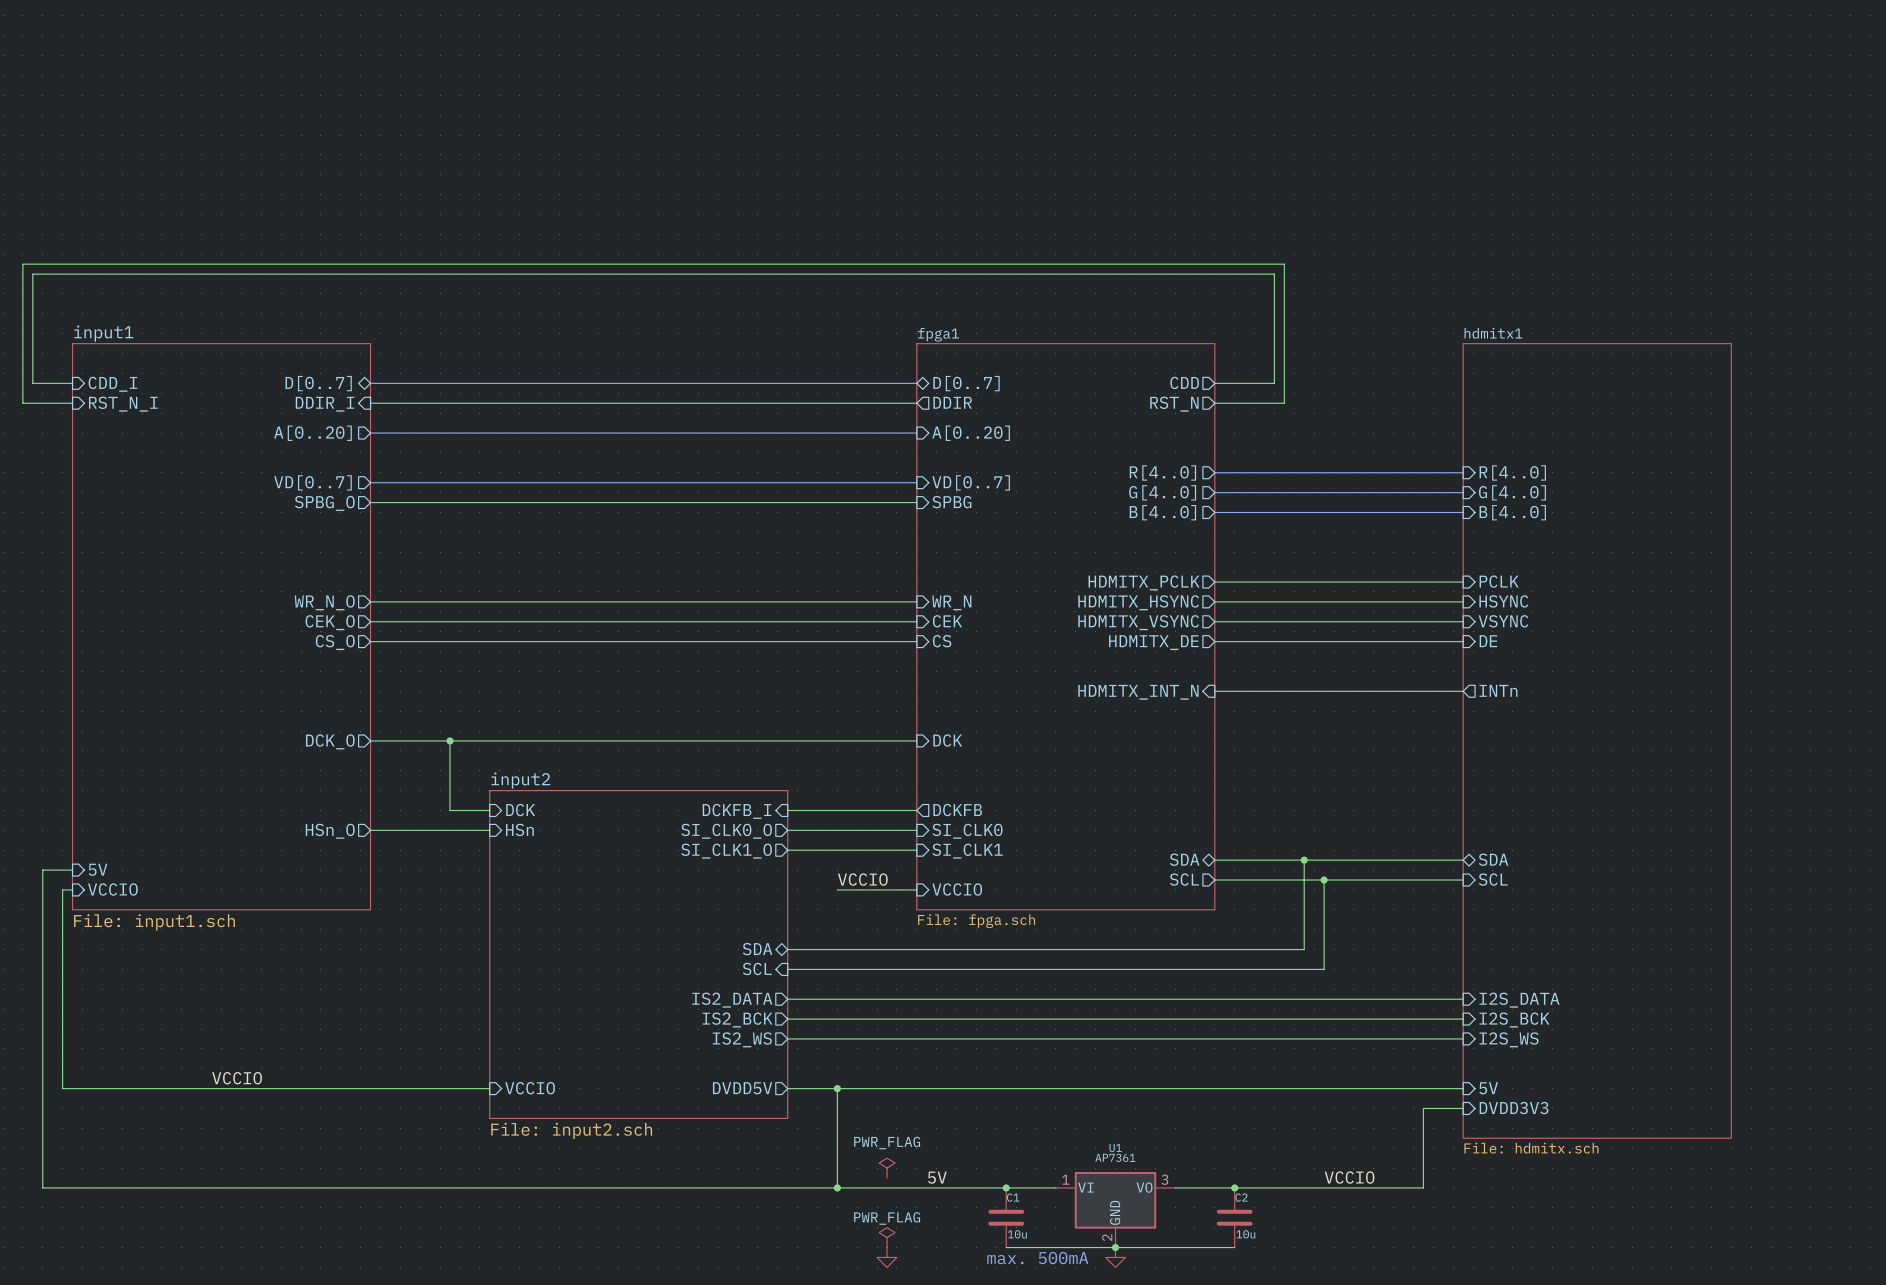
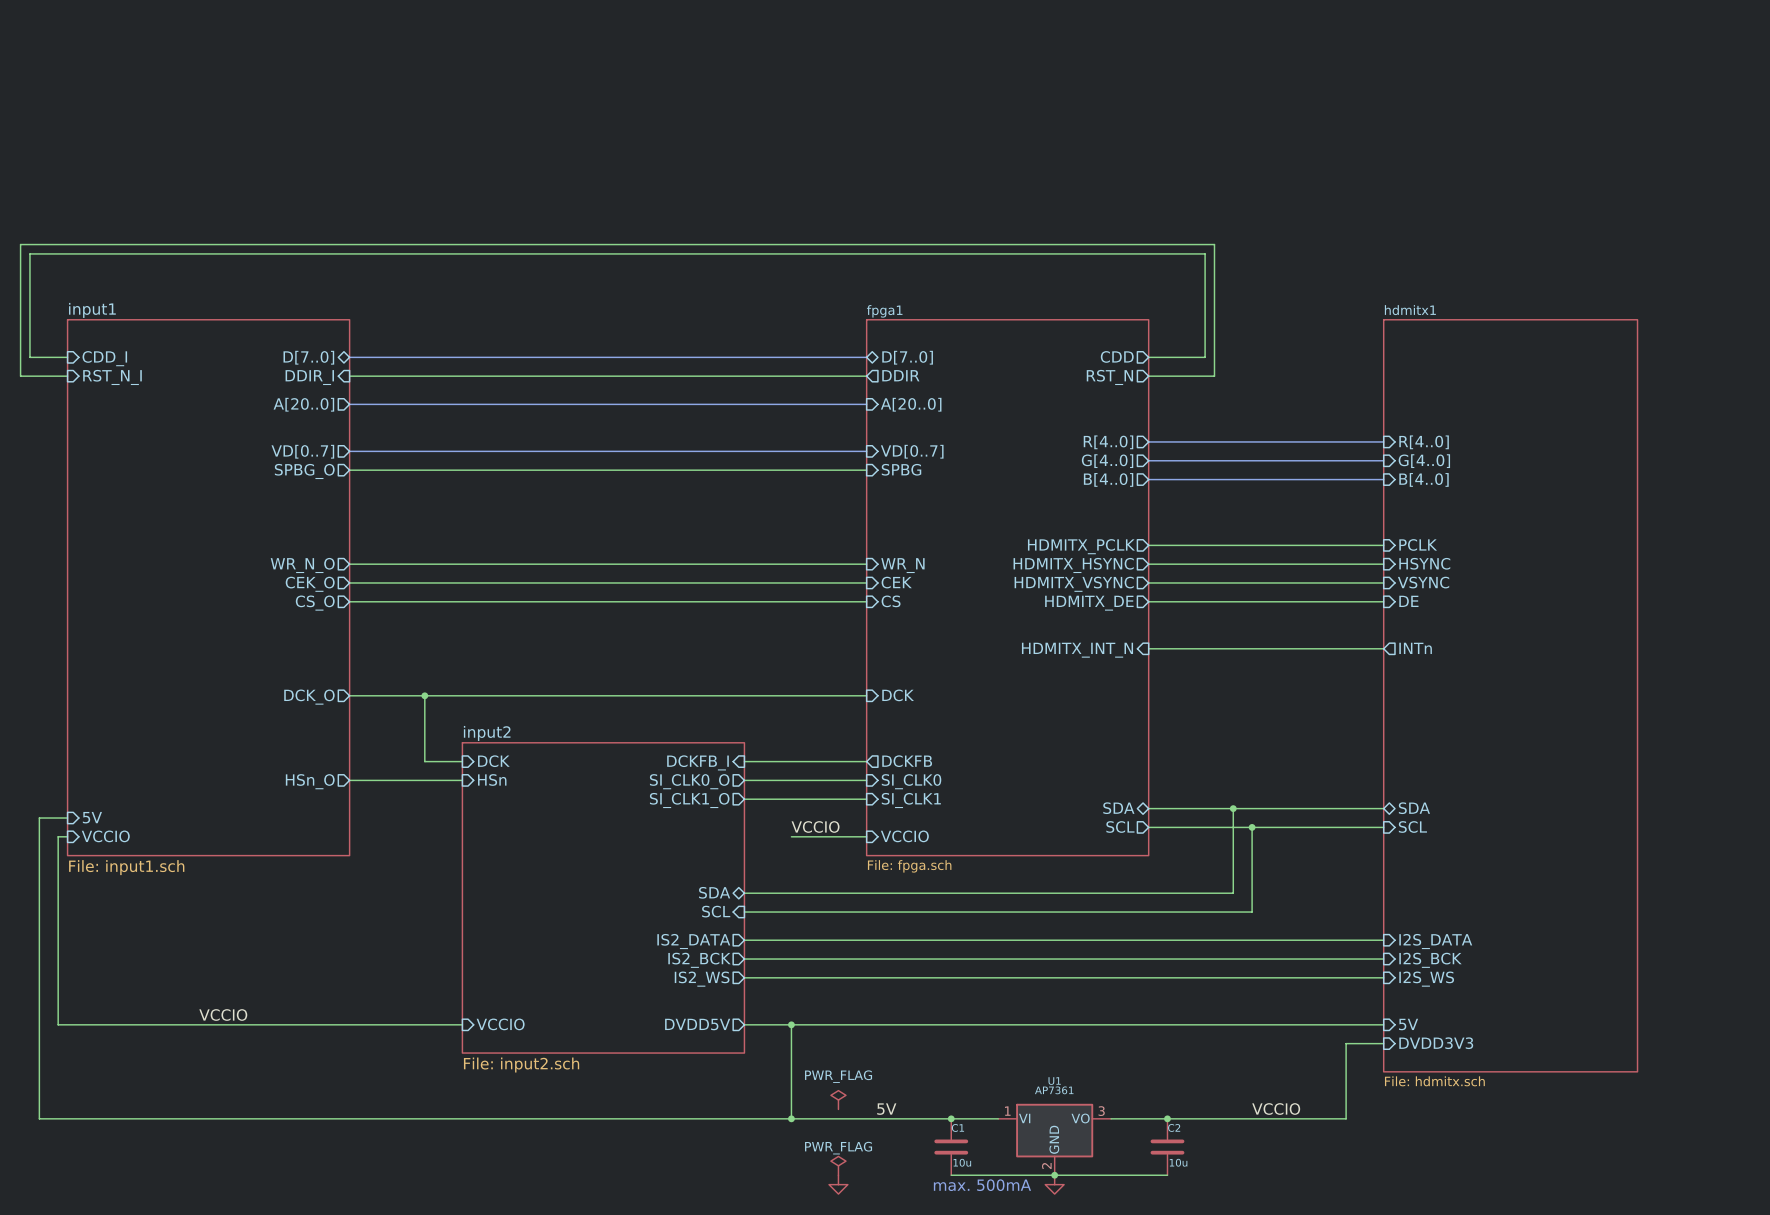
sheet pin: D[0..7] (318, 383) -> D[7..0] (308, 357)
sheet pin: D[0..7] (966, 383) -> D[7..0] (907, 357)
sheet pin: A[0..20] (312, 433) -> A[20..0] (303, 404)
sheet pin: A[0..20] (971, 433) -> A[20..0] (911, 404)

